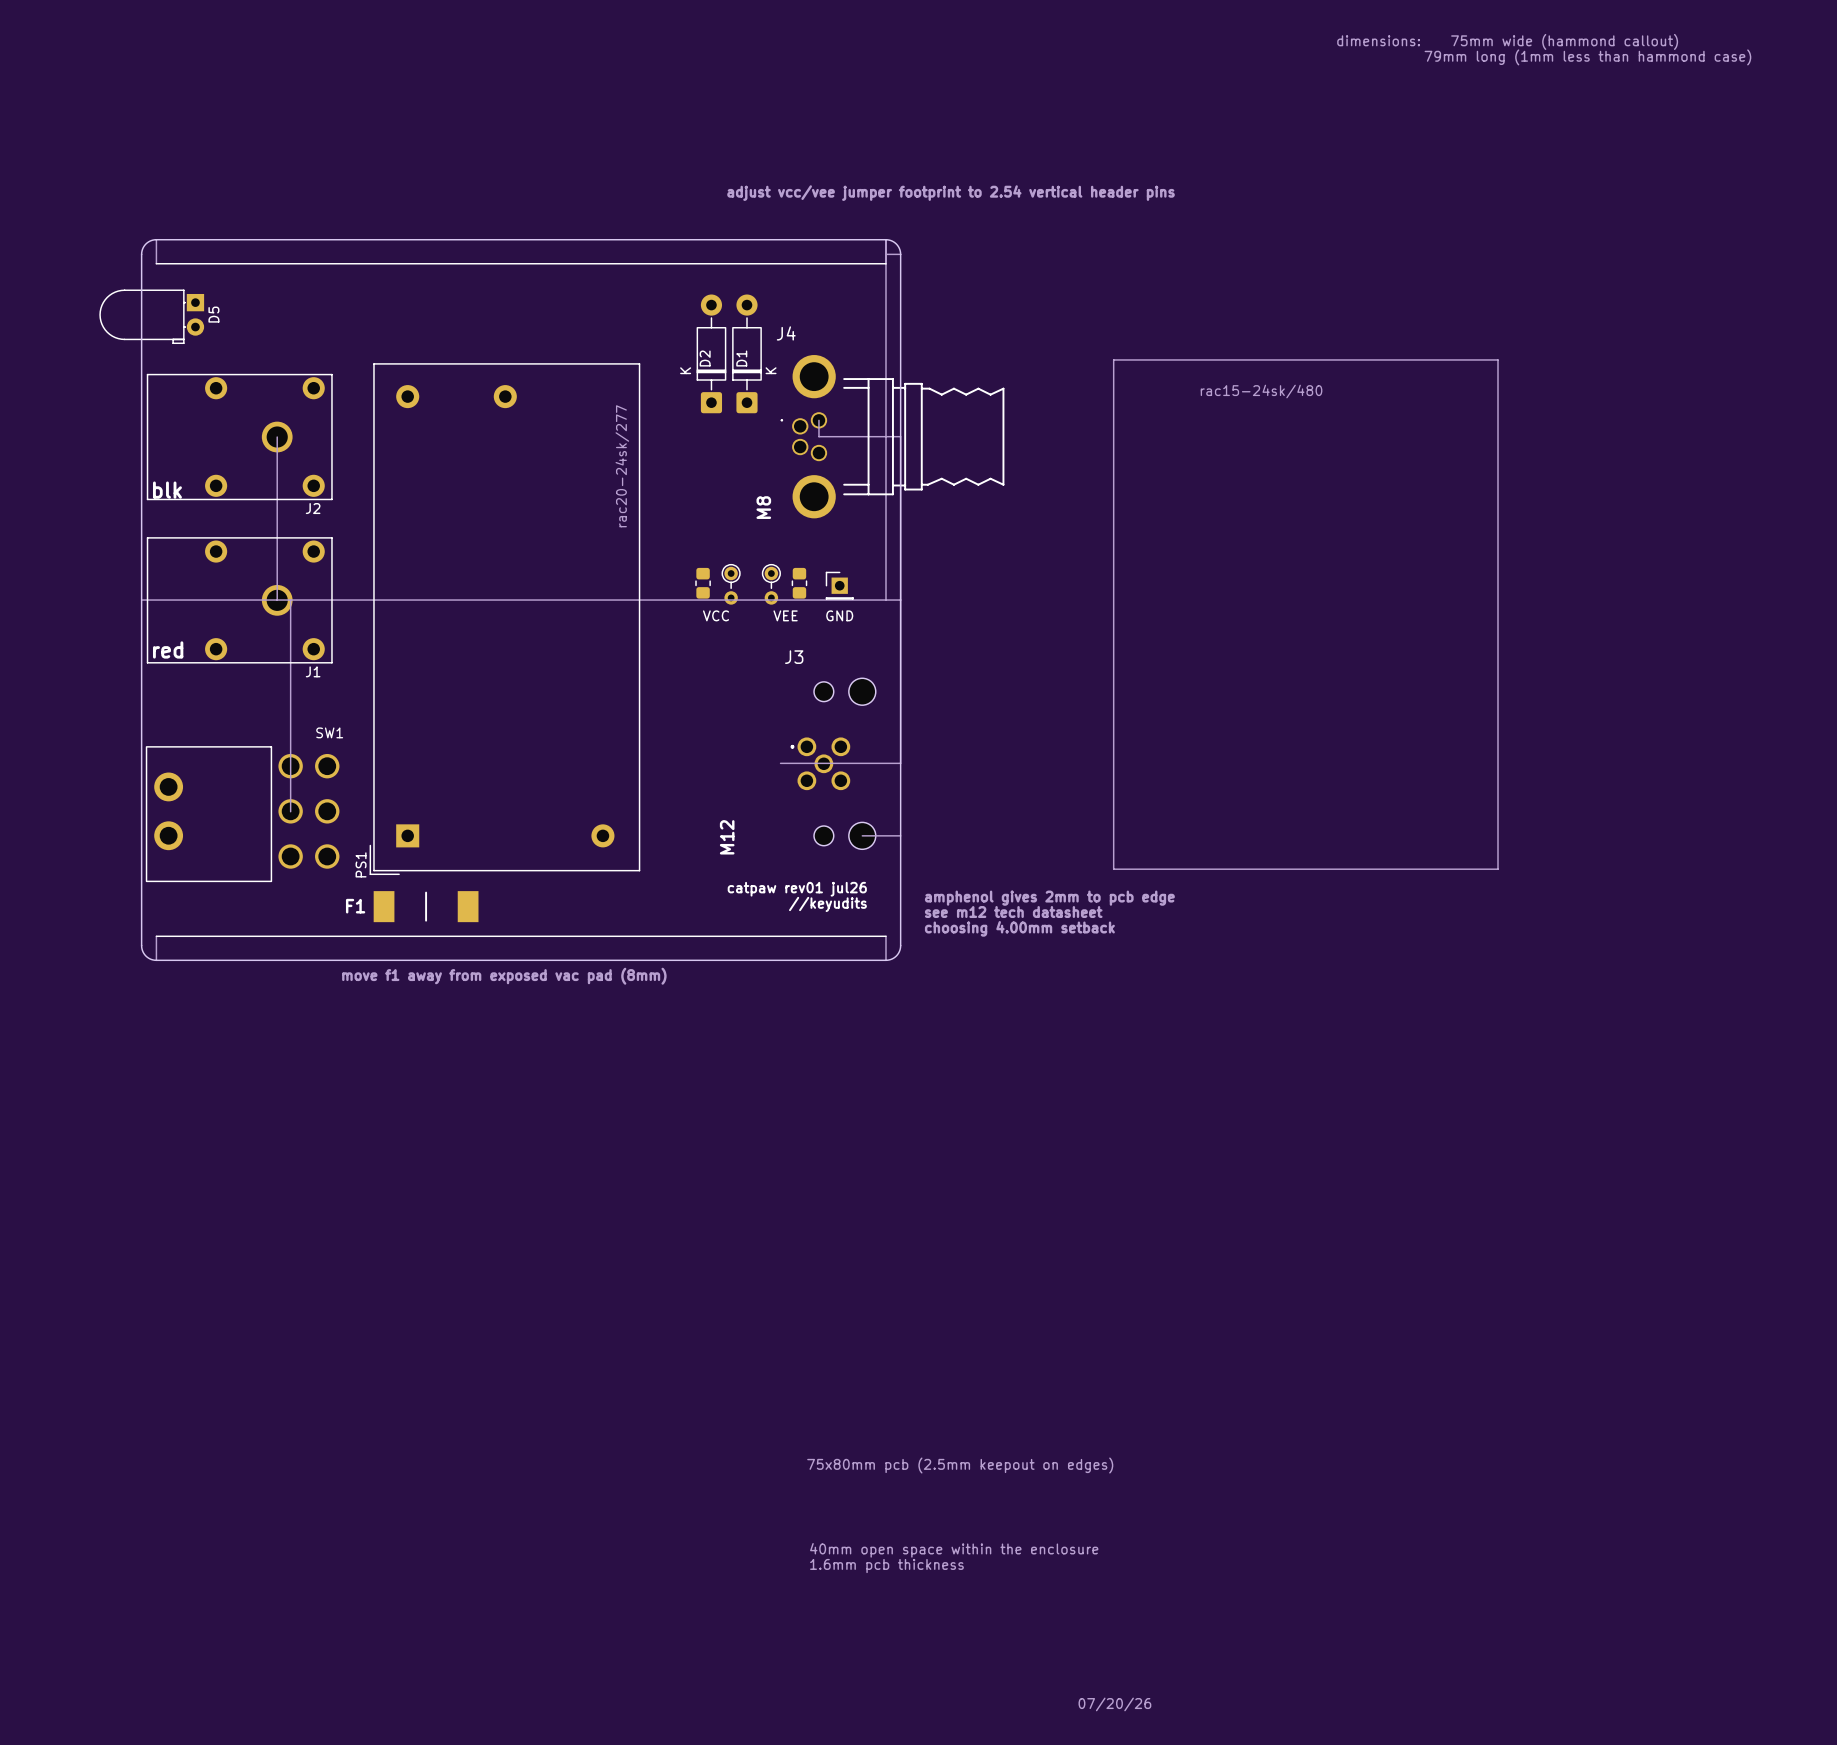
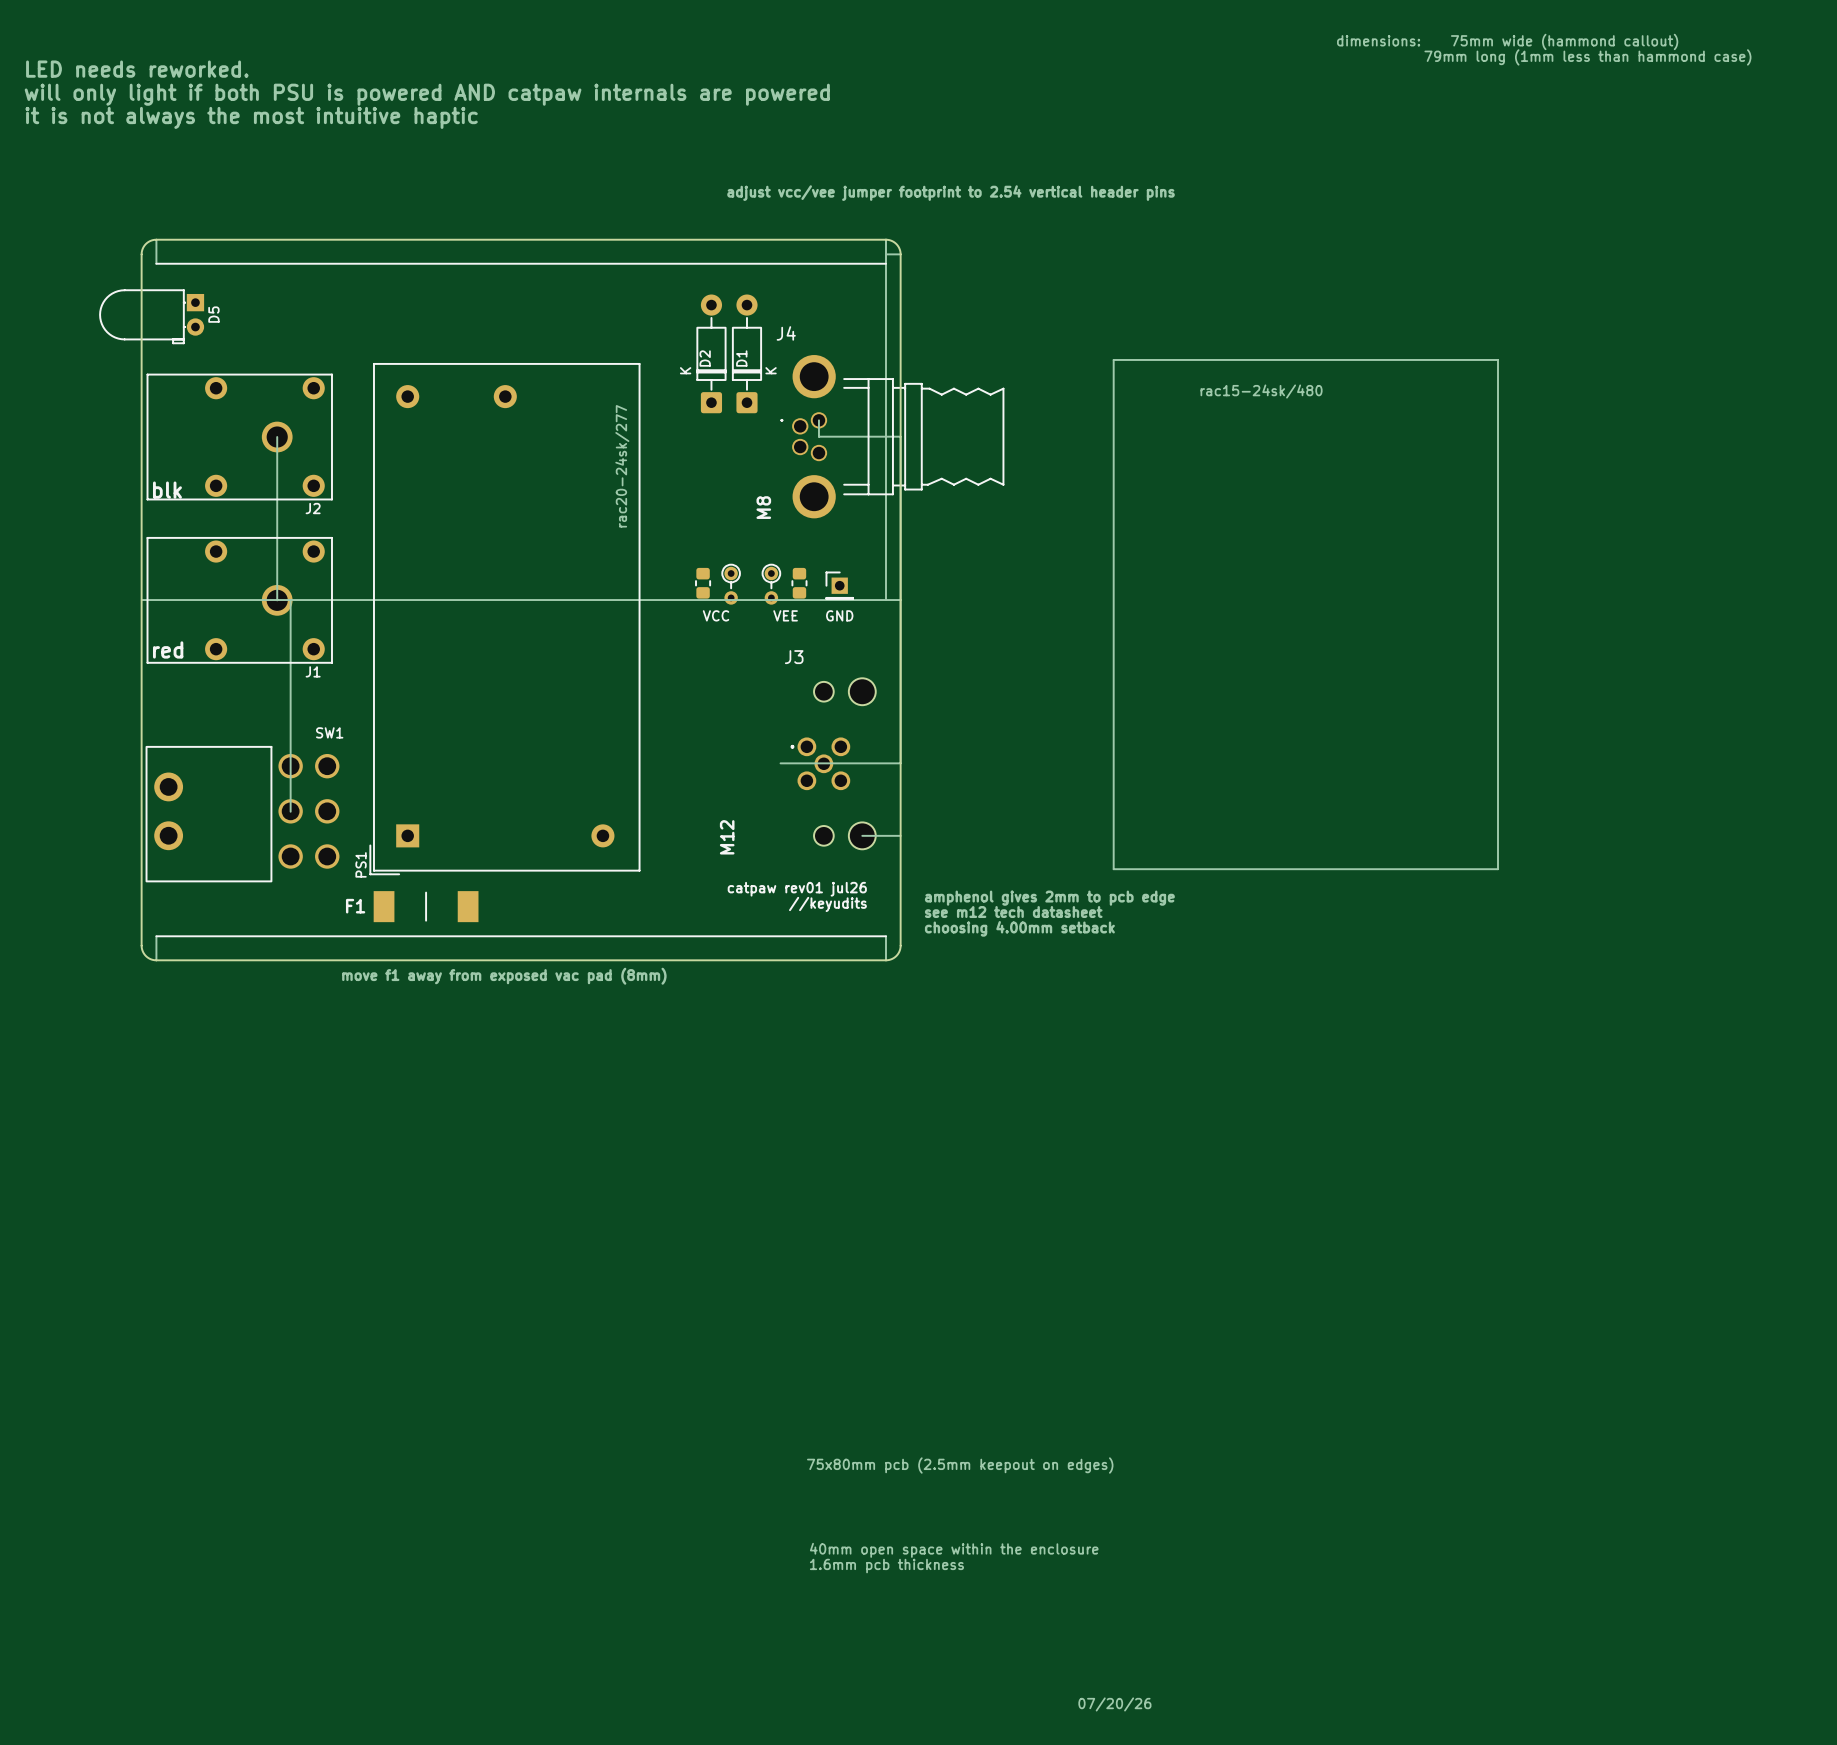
text: none -> LED needs reworked. (137, 69)
text: none -> will only light if both PSU is powered AND catpaw internals are powered (427, 94)
text: none -> it is not always the most intuitive haptic (251, 117)

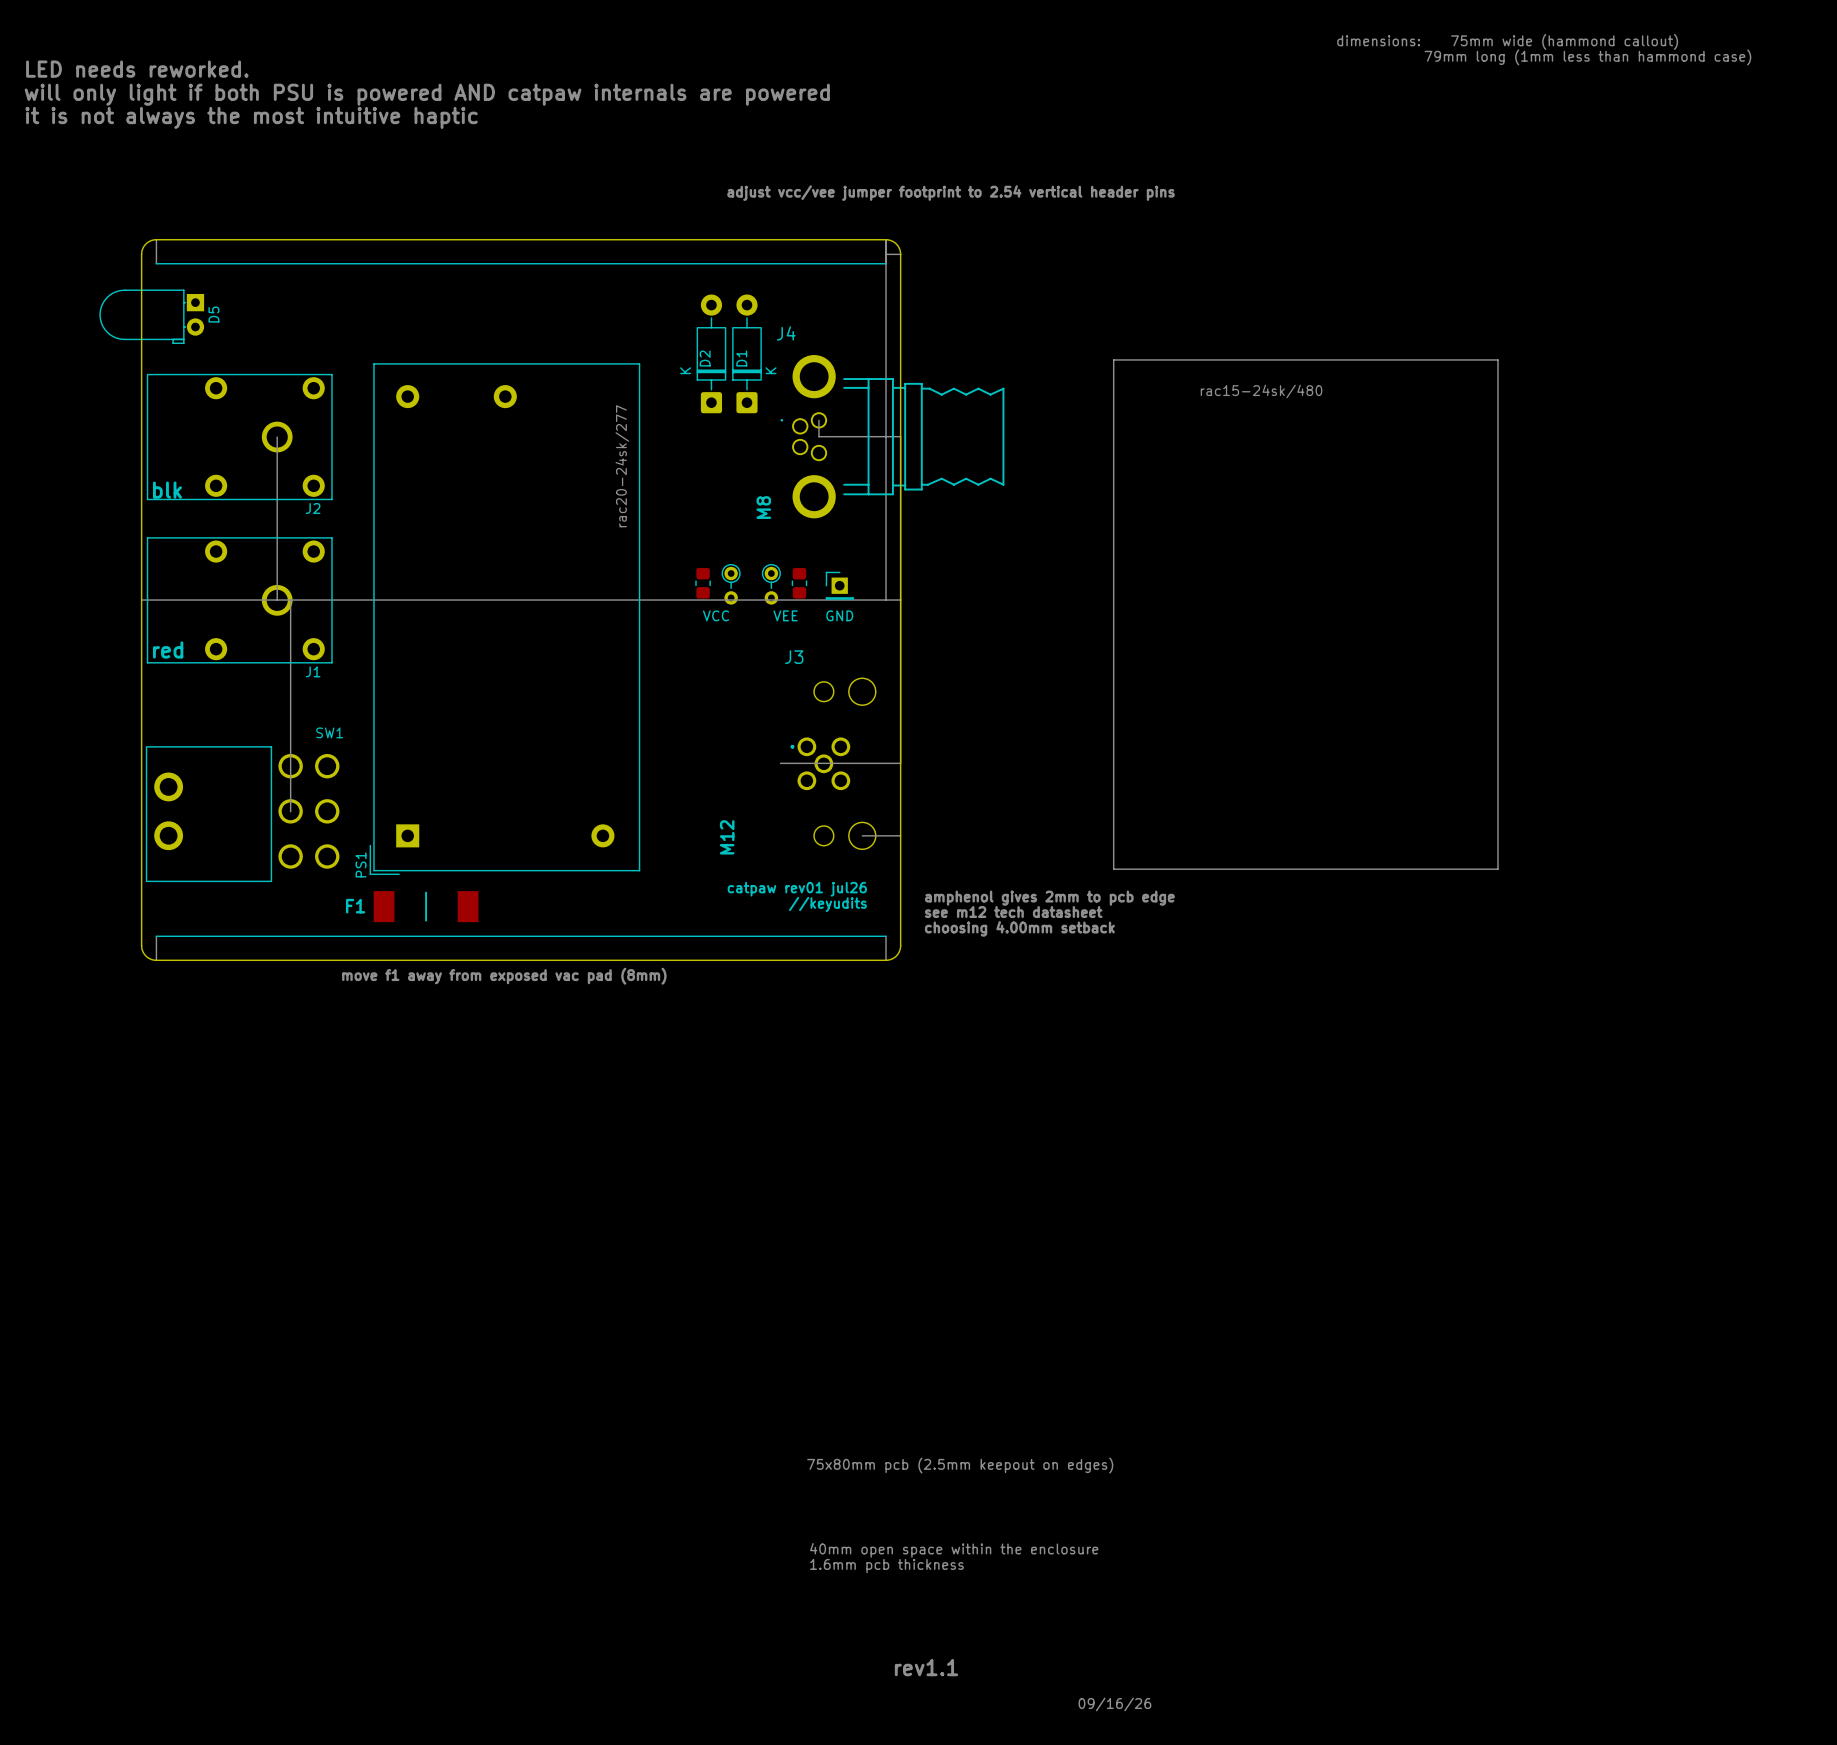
text: none -> rev1.1 (926, 1667)
text: 07/20/26 (1114, 1704) -> 09/16/26 (1114, 1704)

